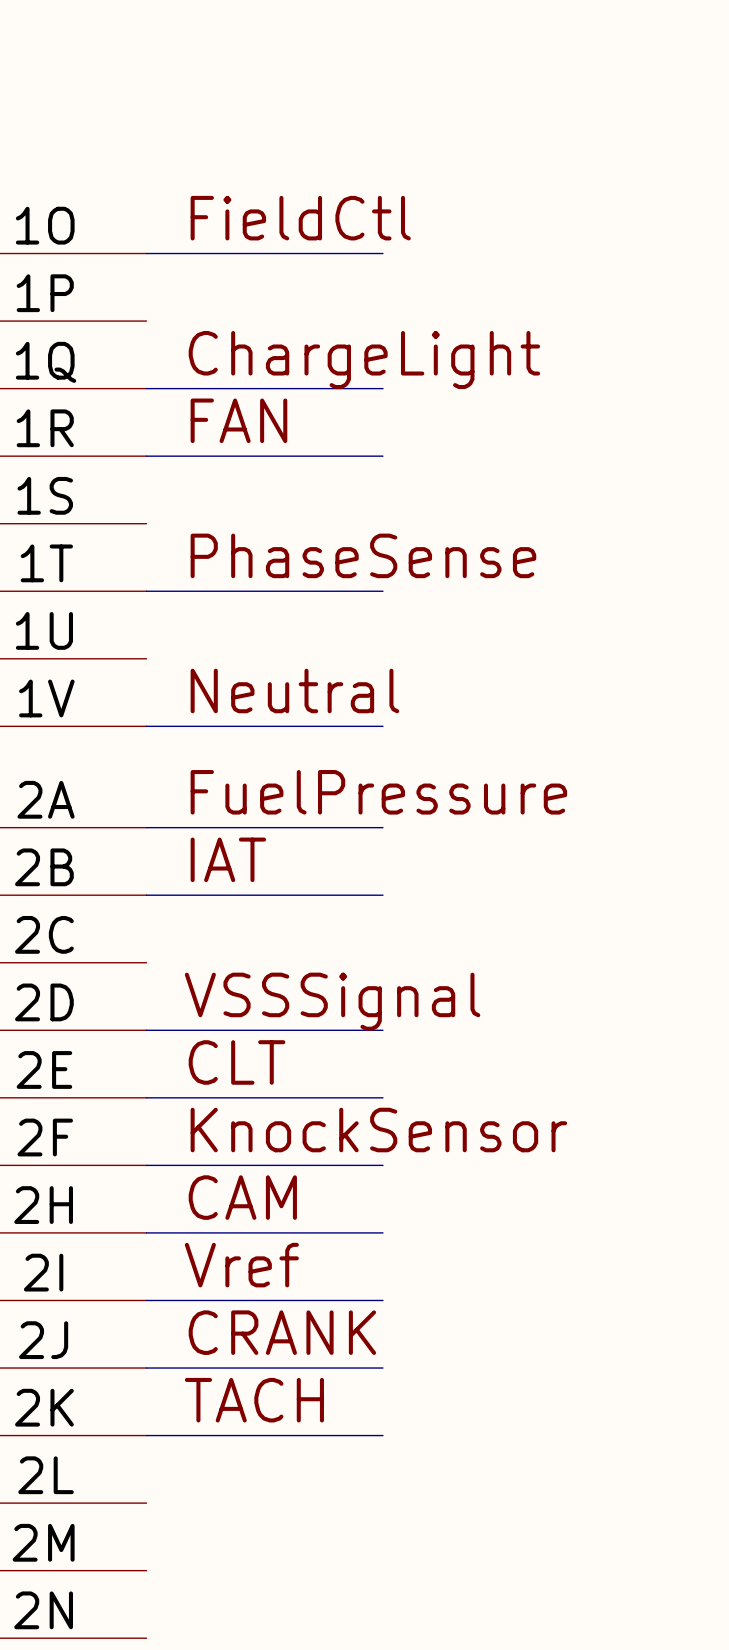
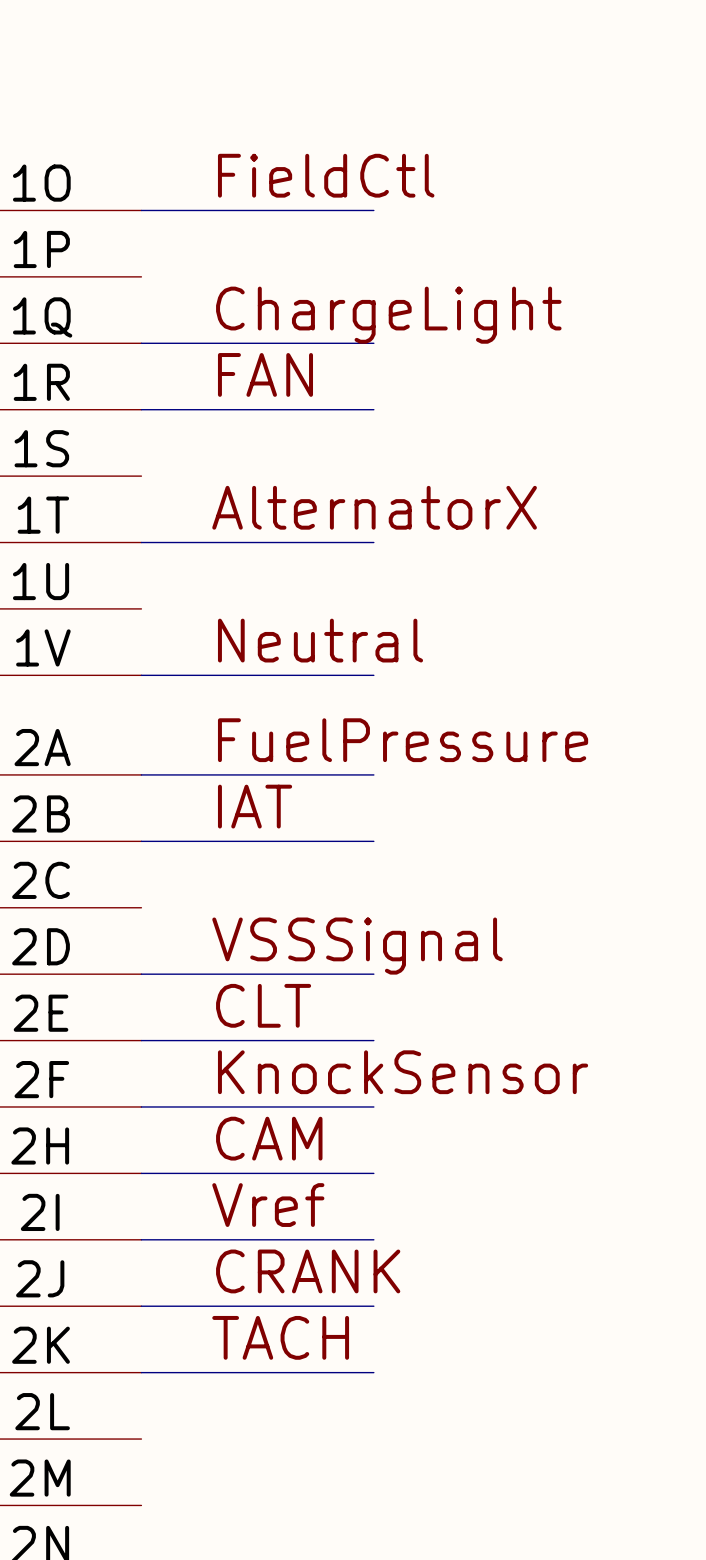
label position: FieldCtl (300, 218) -> FieldCtl (326, 175)
label position: ChargeLight (364, 360) -> ChargeLight (388, 315)
label position: FAN (238, 420) -> FAN (265, 374)
label: PhaseSense (363, 555) -> none
label: none -> AlternatorX (374, 507)
label position: Neutral (294, 690) -> Neutral (320, 640)
label position: FuelPressure (378, 792) -> FuelPressure (403, 740)
label position: IAT (228, 859) -> IAT (255, 806)
label position: VSSSignal (332, 1001) -> VSSSignal (357, 946)
label position: CLT (237, 1062) -> CLT (263, 1005)
label position: KnockSensor (378, 1130) -> KnockSensor (403, 1072)
label position: CAM (242, 1197) -> CAM (269, 1138)
label position: Vref (241, 1265) -> Vref (268, 1205)
label position: CRANK (282, 1332) -> CRANK (308, 1271)
label position: TACH (254, 1400) -> TACH (280, 1337)

